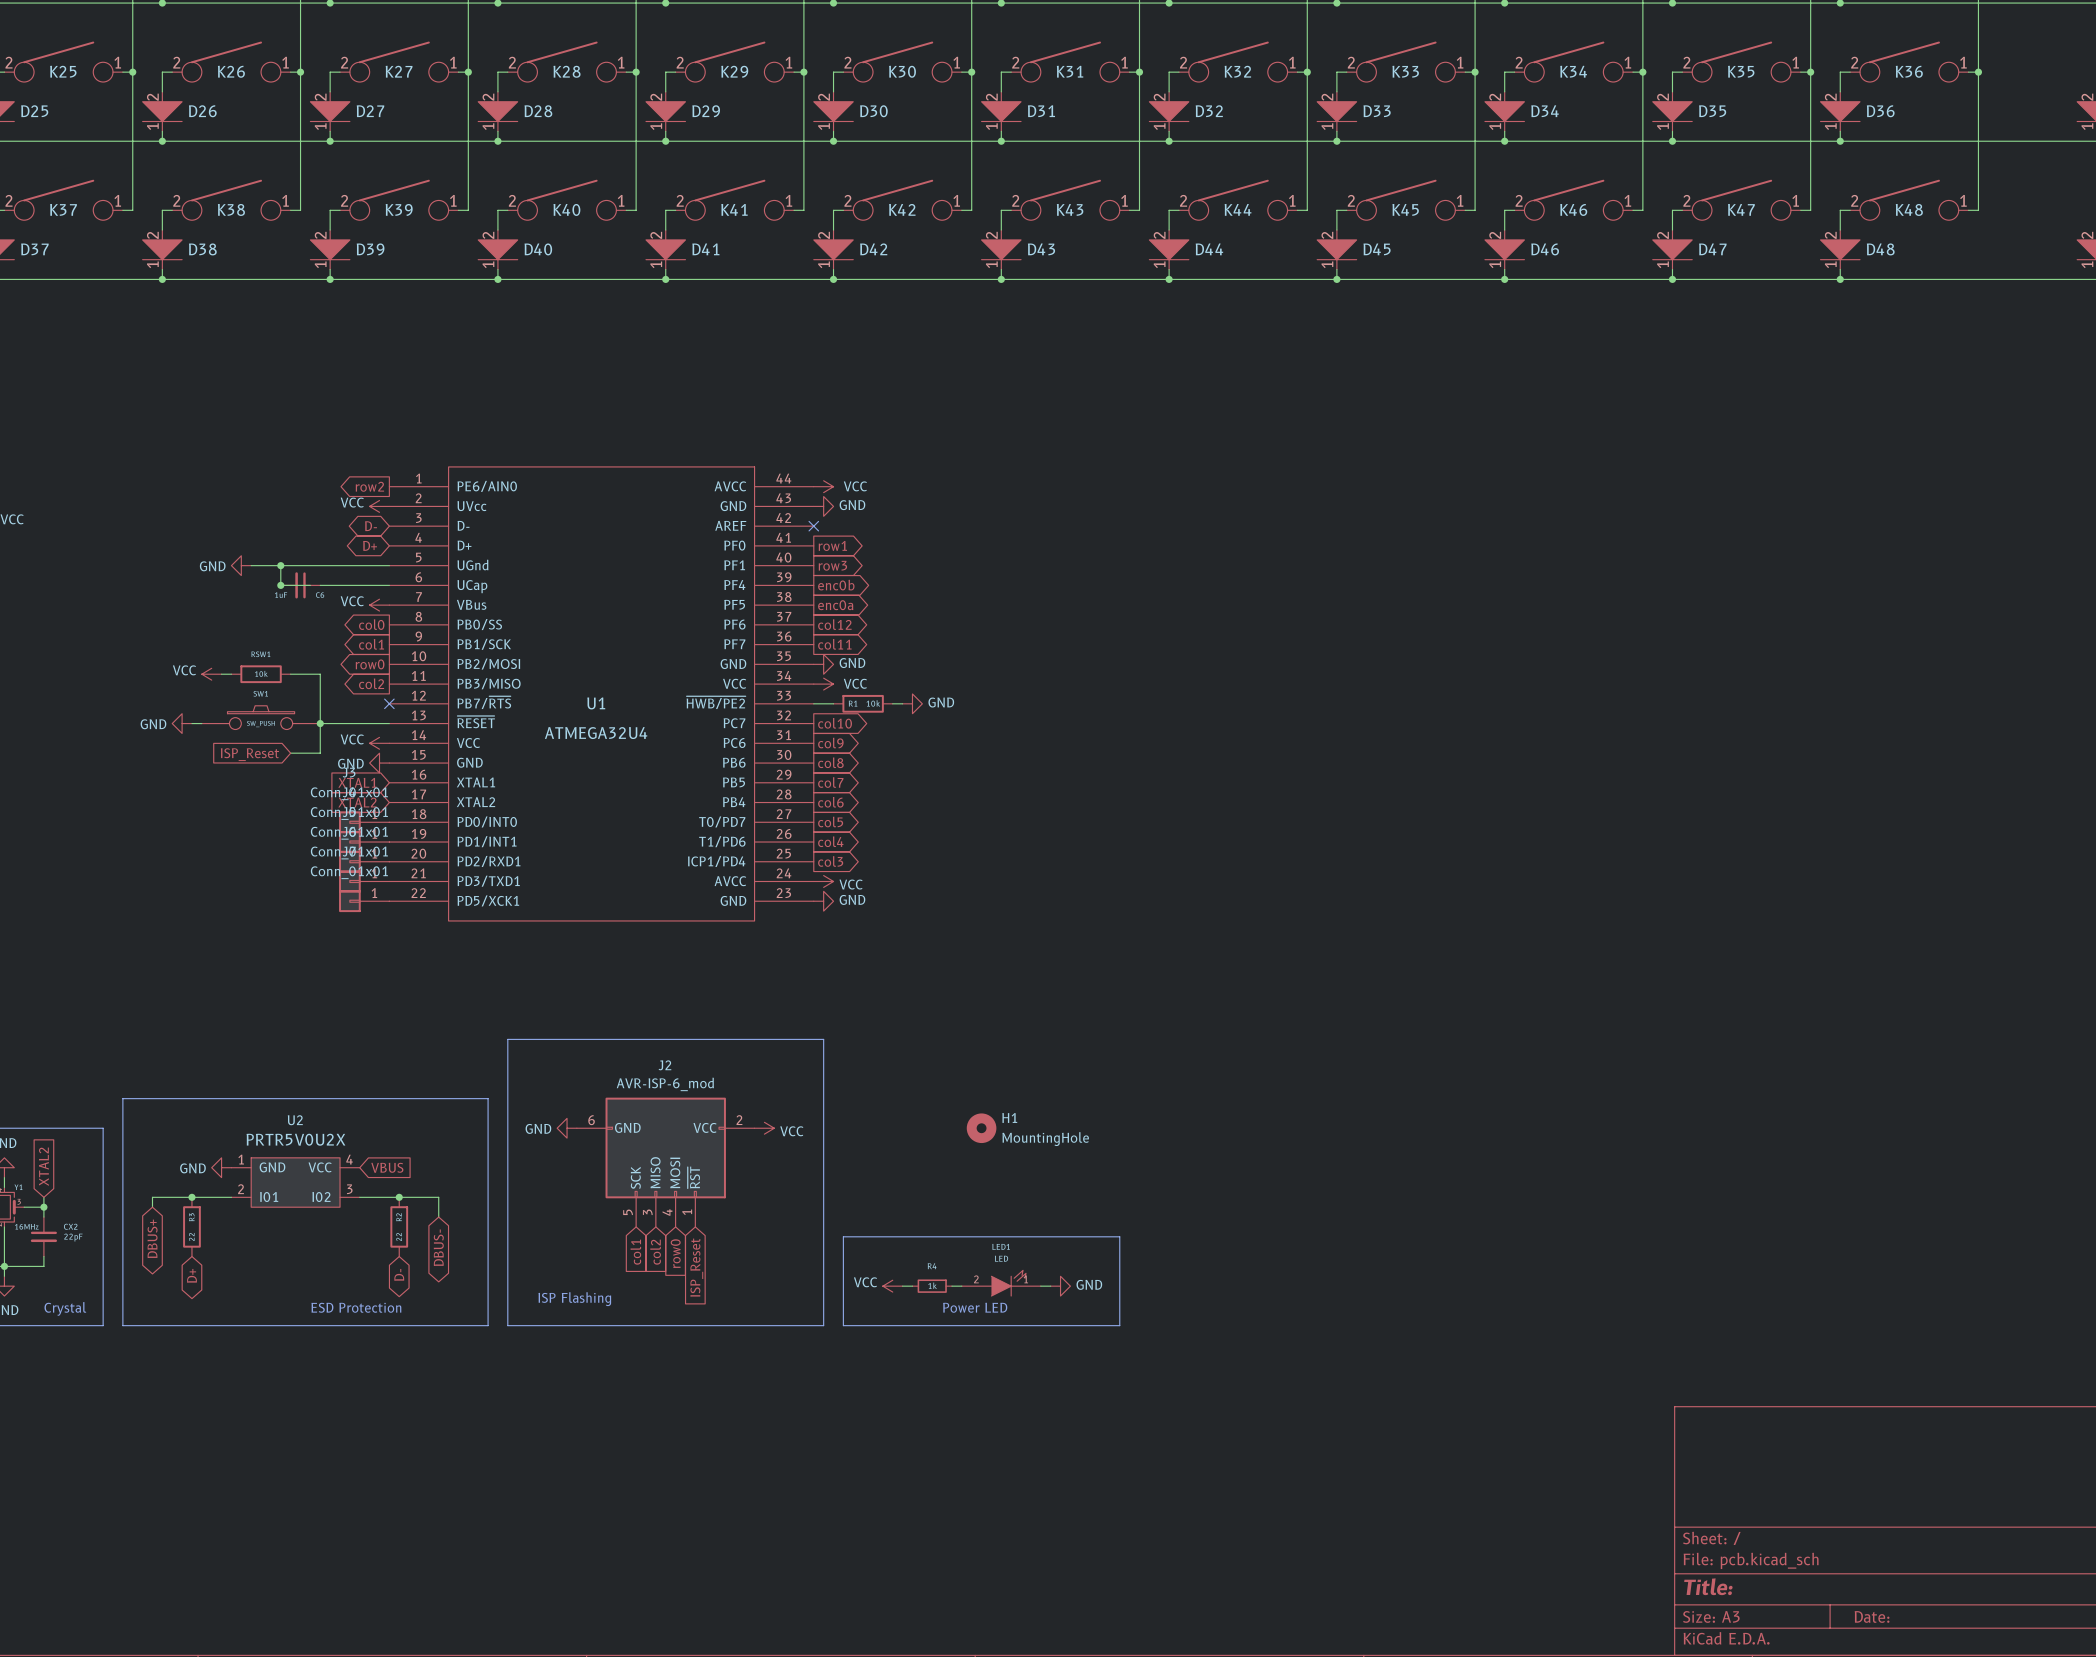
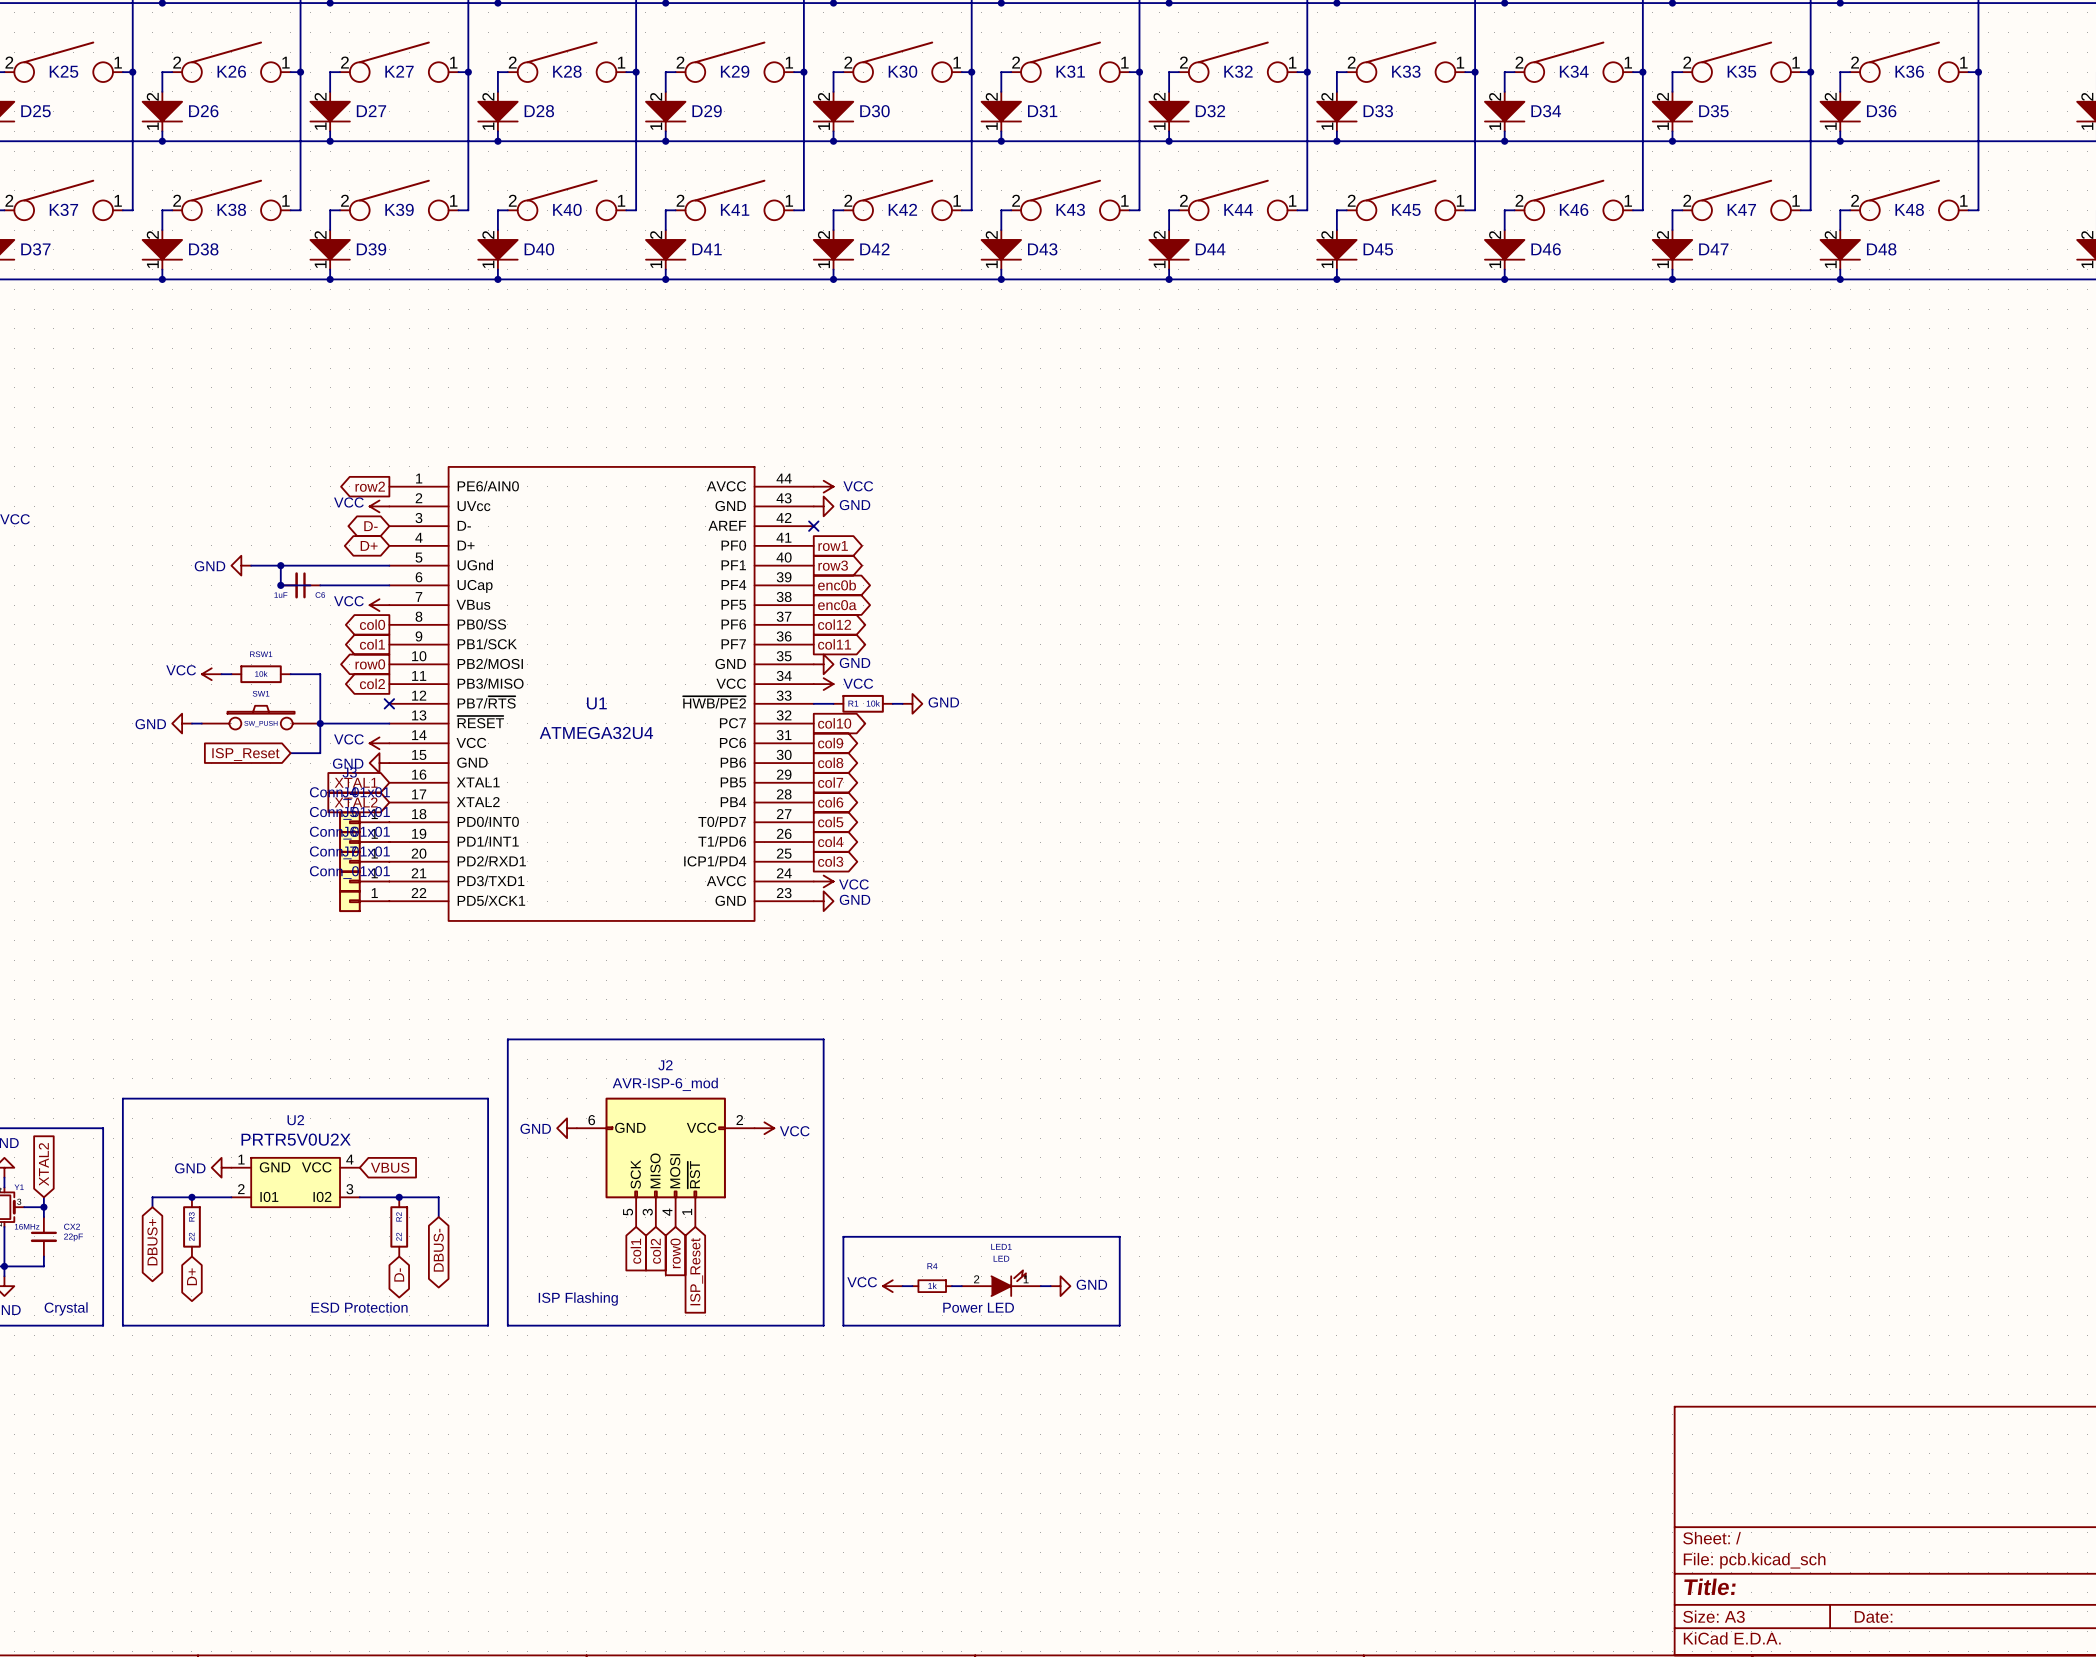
H1: MountingHole (981, 1128) -> none

